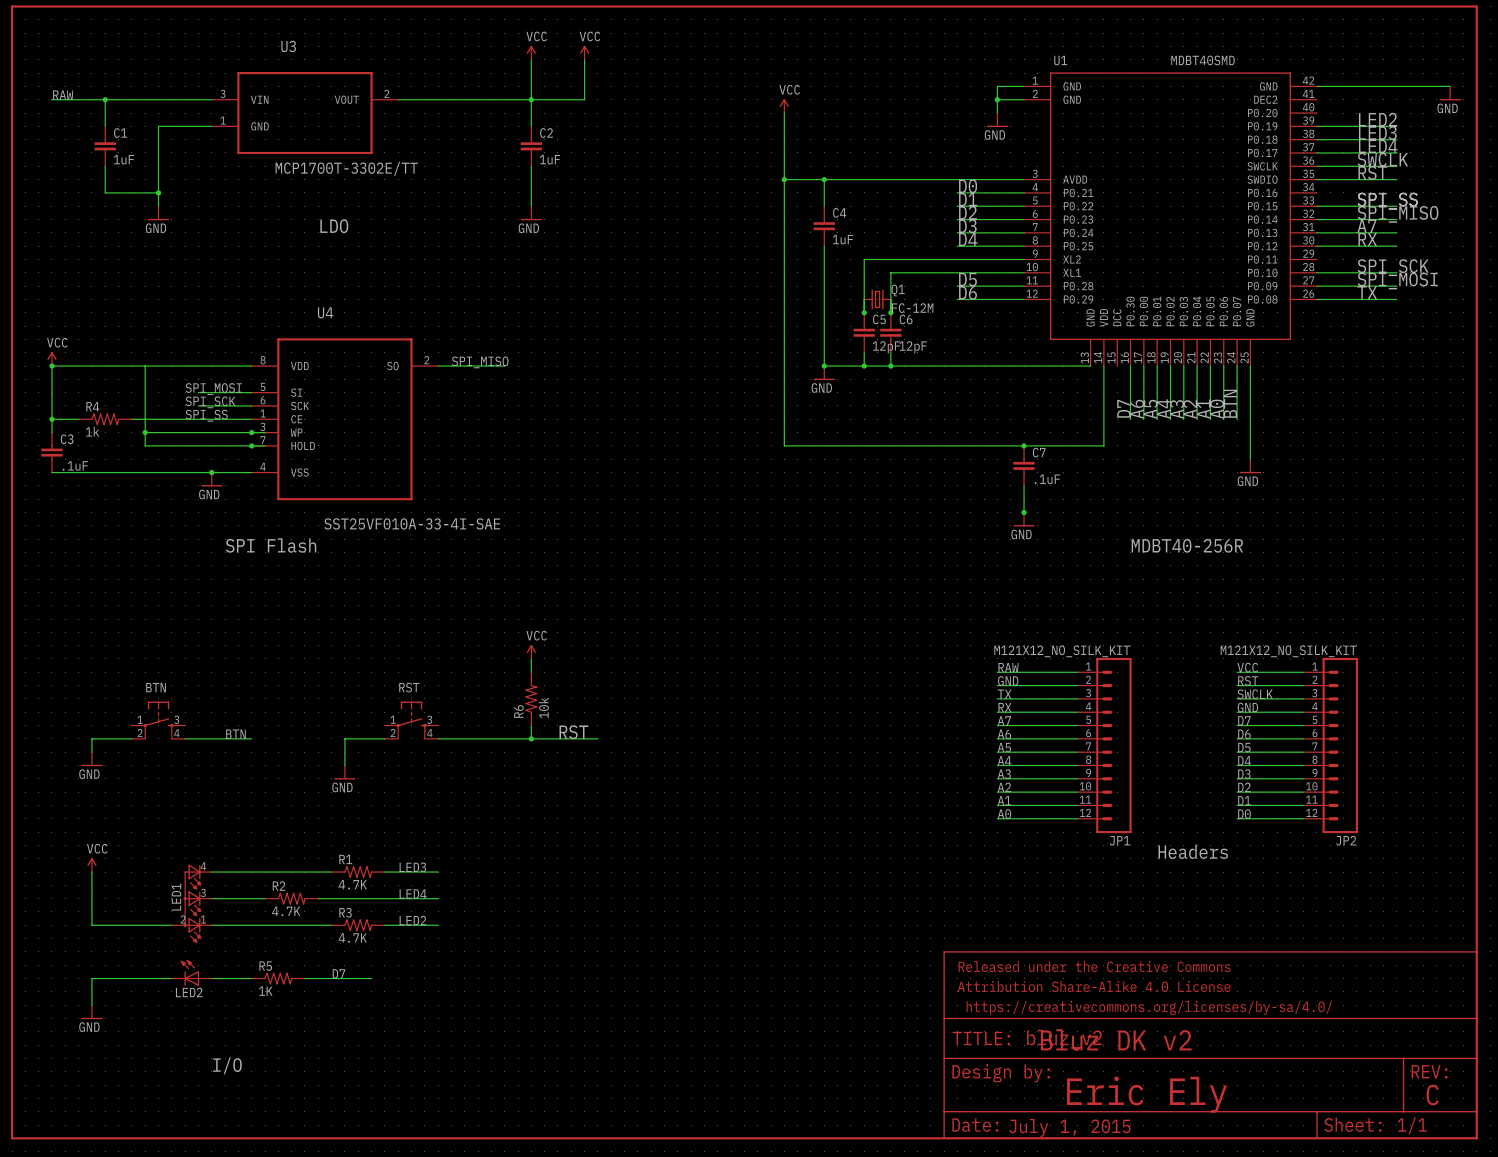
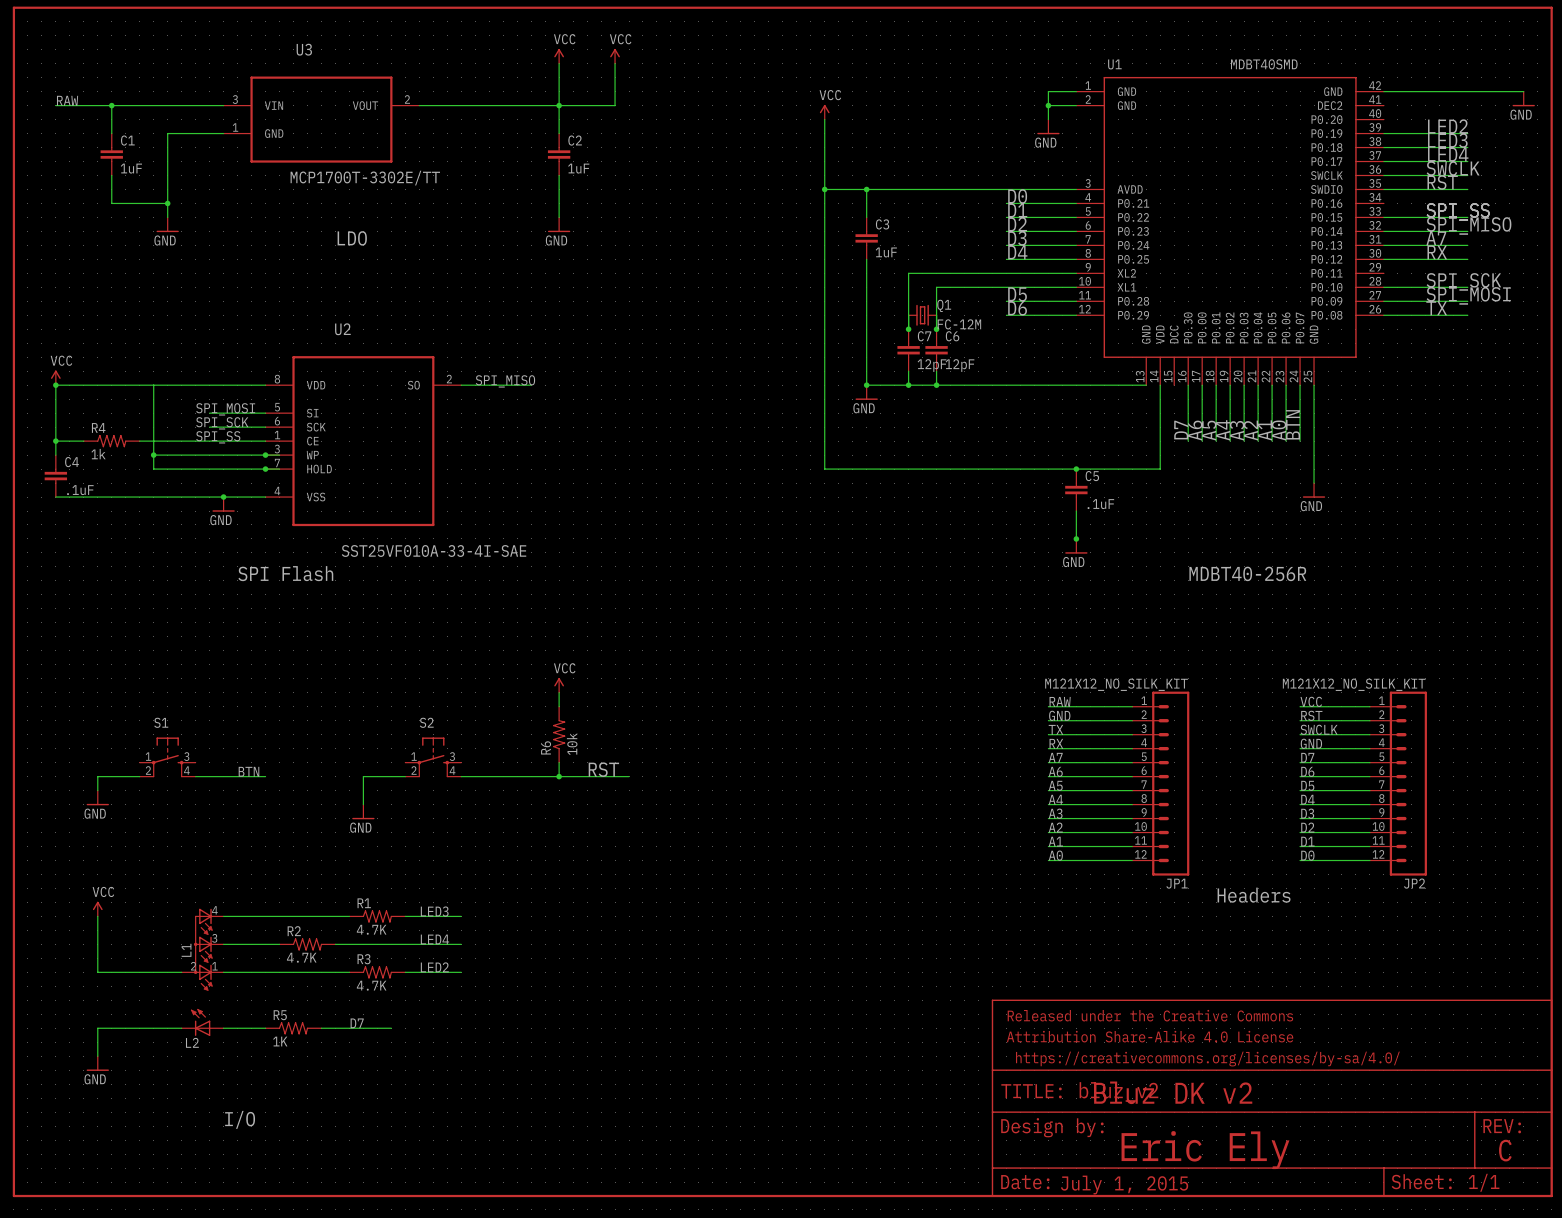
C4 name: C4 (839, 212) -> C3 (882, 224)
U4 name: U4 (325, 312) -> U2 (342, 329)
C5 name: C5 (879, 319) -> C7 (924, 336)
C3 name: C3 (67, 439) -> C4 (72, 462)
C7 name: C7 (1039, 452) -> C5 (1092, 476)
BTN name: BTN (156, 687) -> S1 (161, 722)
RST name: RST (409, 687) -> S2 (426, 722)
LED1 name: LED1 (176, 897) -> L1 (186, 950)
LED2 name: LED2 (189, 992) -> L2 (192, 1042)

